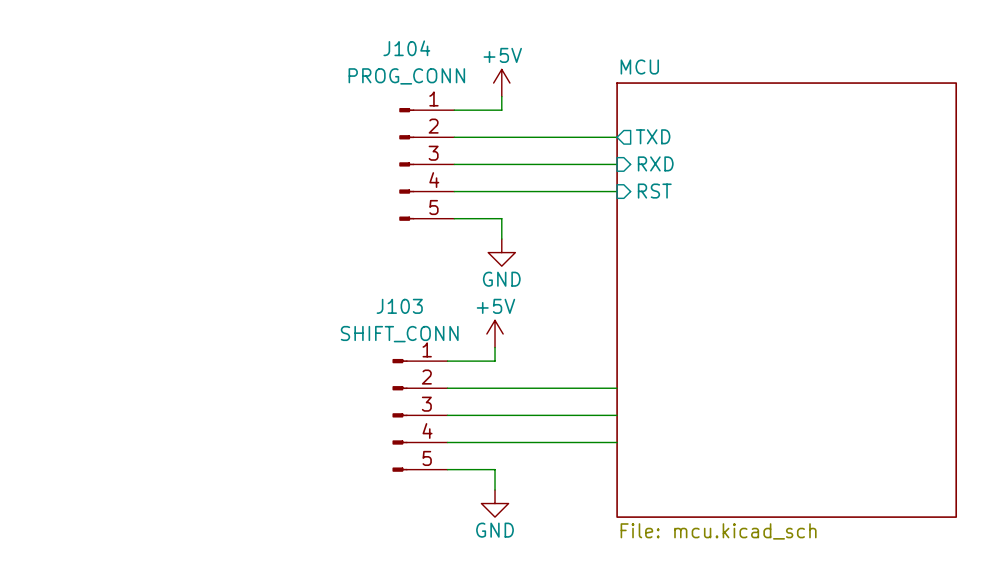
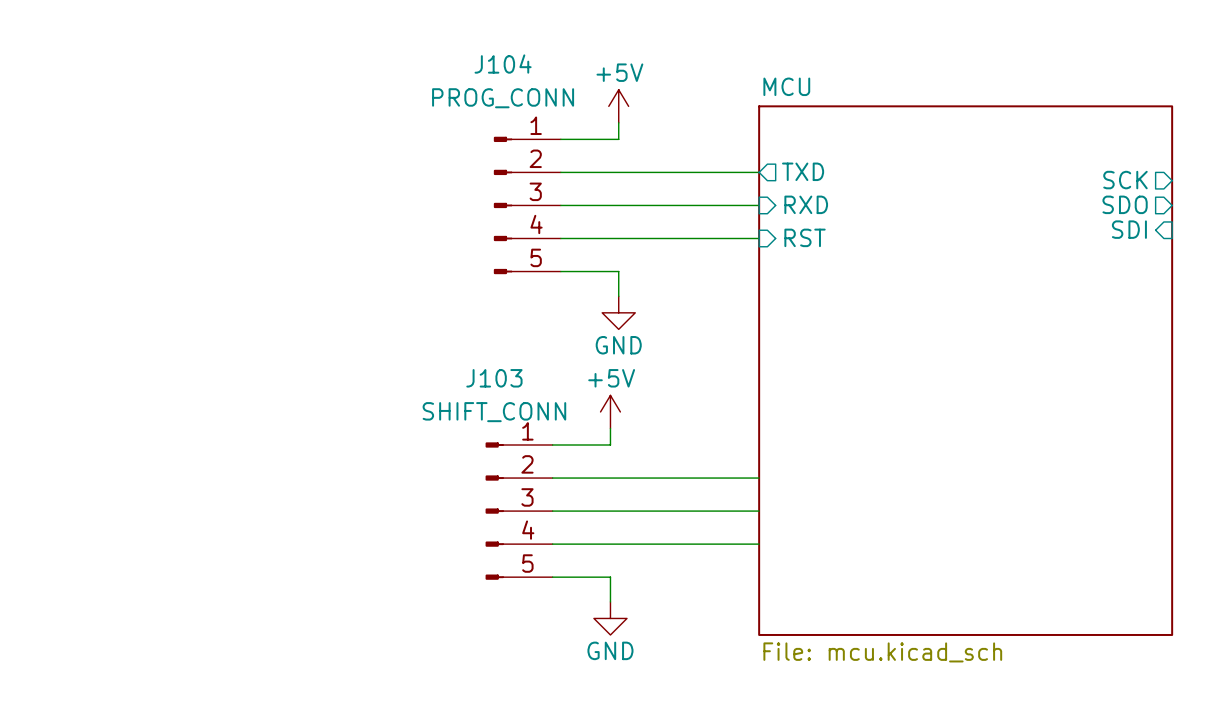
sheet pin: none -> SCK (1125, 180)
sheet pin: none -> SDO (1125, 204)
sheet pin: none -> SDI (1129, 229)

